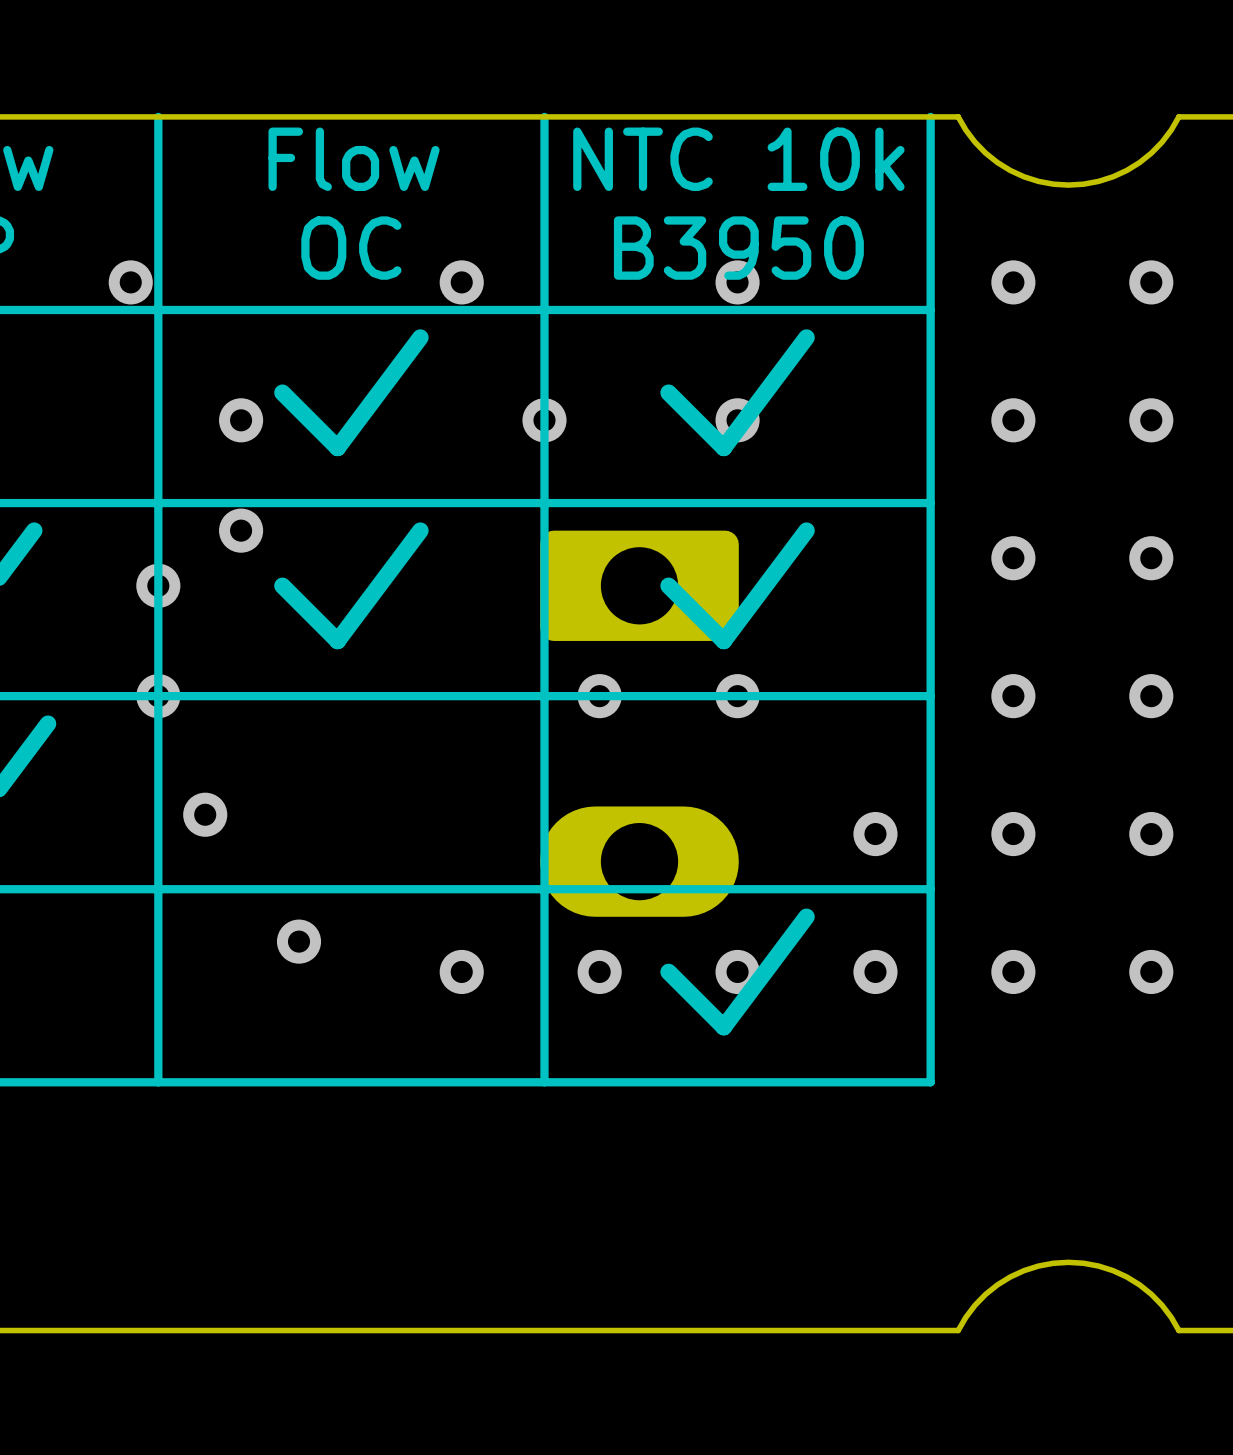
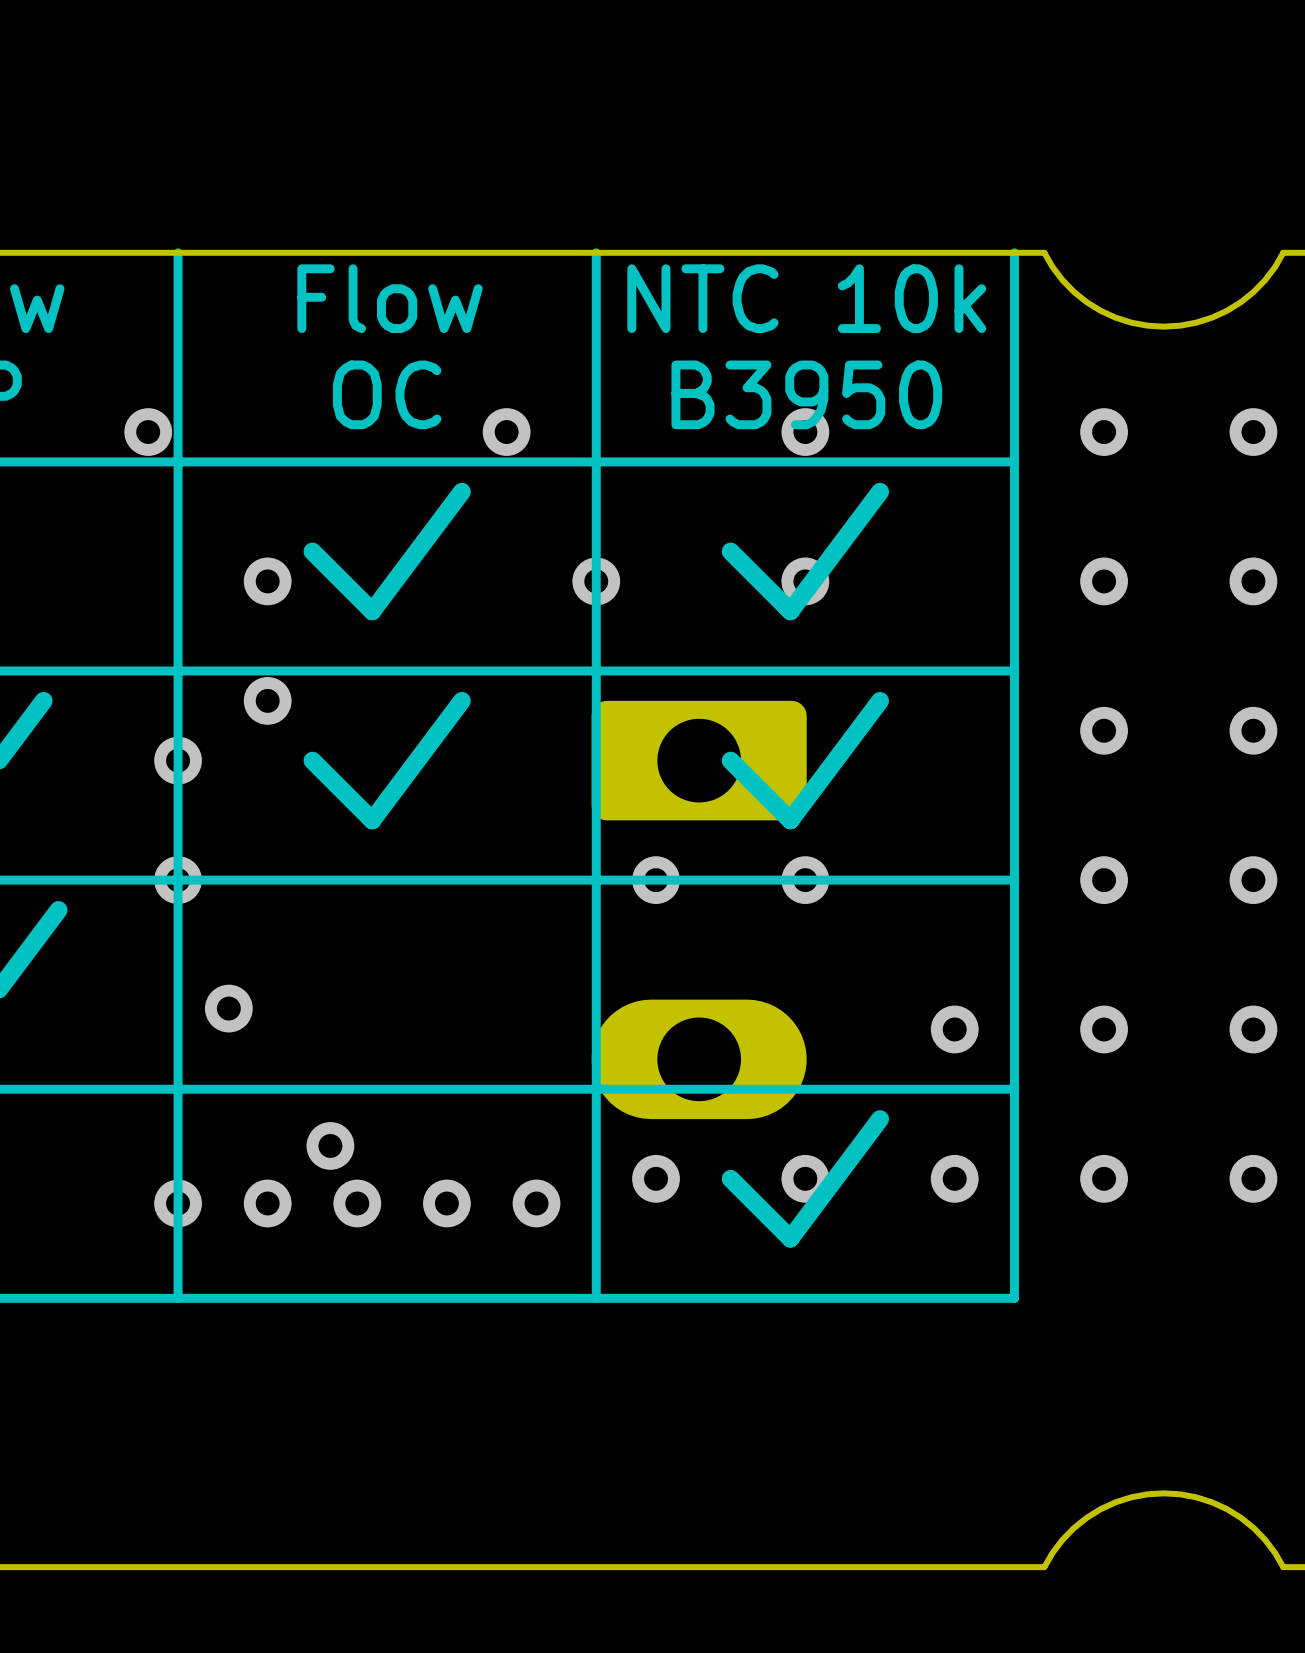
via position: (461, 971) -> (536, 1203)
via: none -> (178, 1203)
via: none -> (267, 1203)
via: none -> (357, 1203)
via: none -> (446, 1203)

